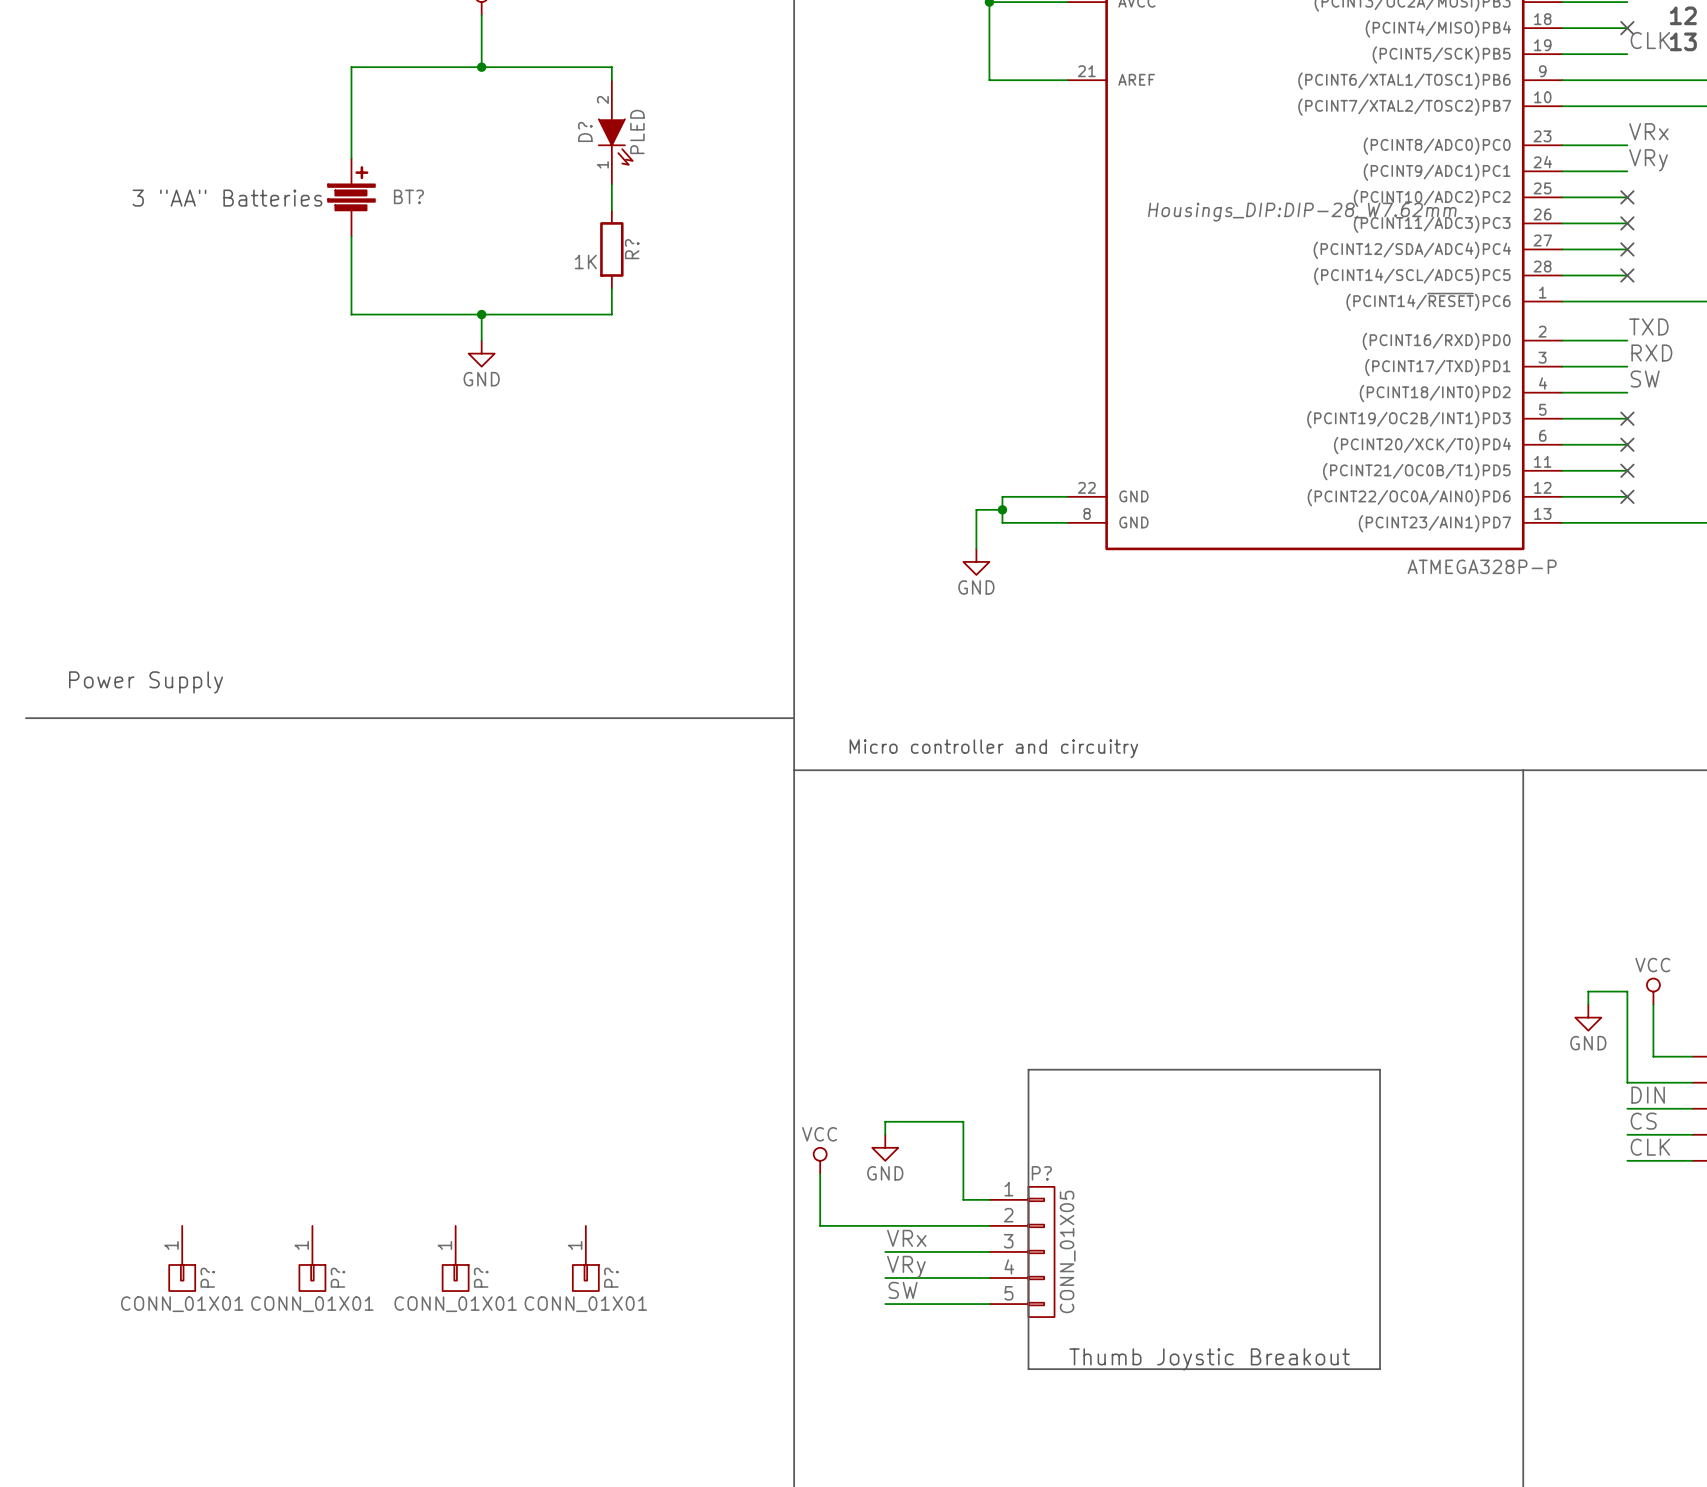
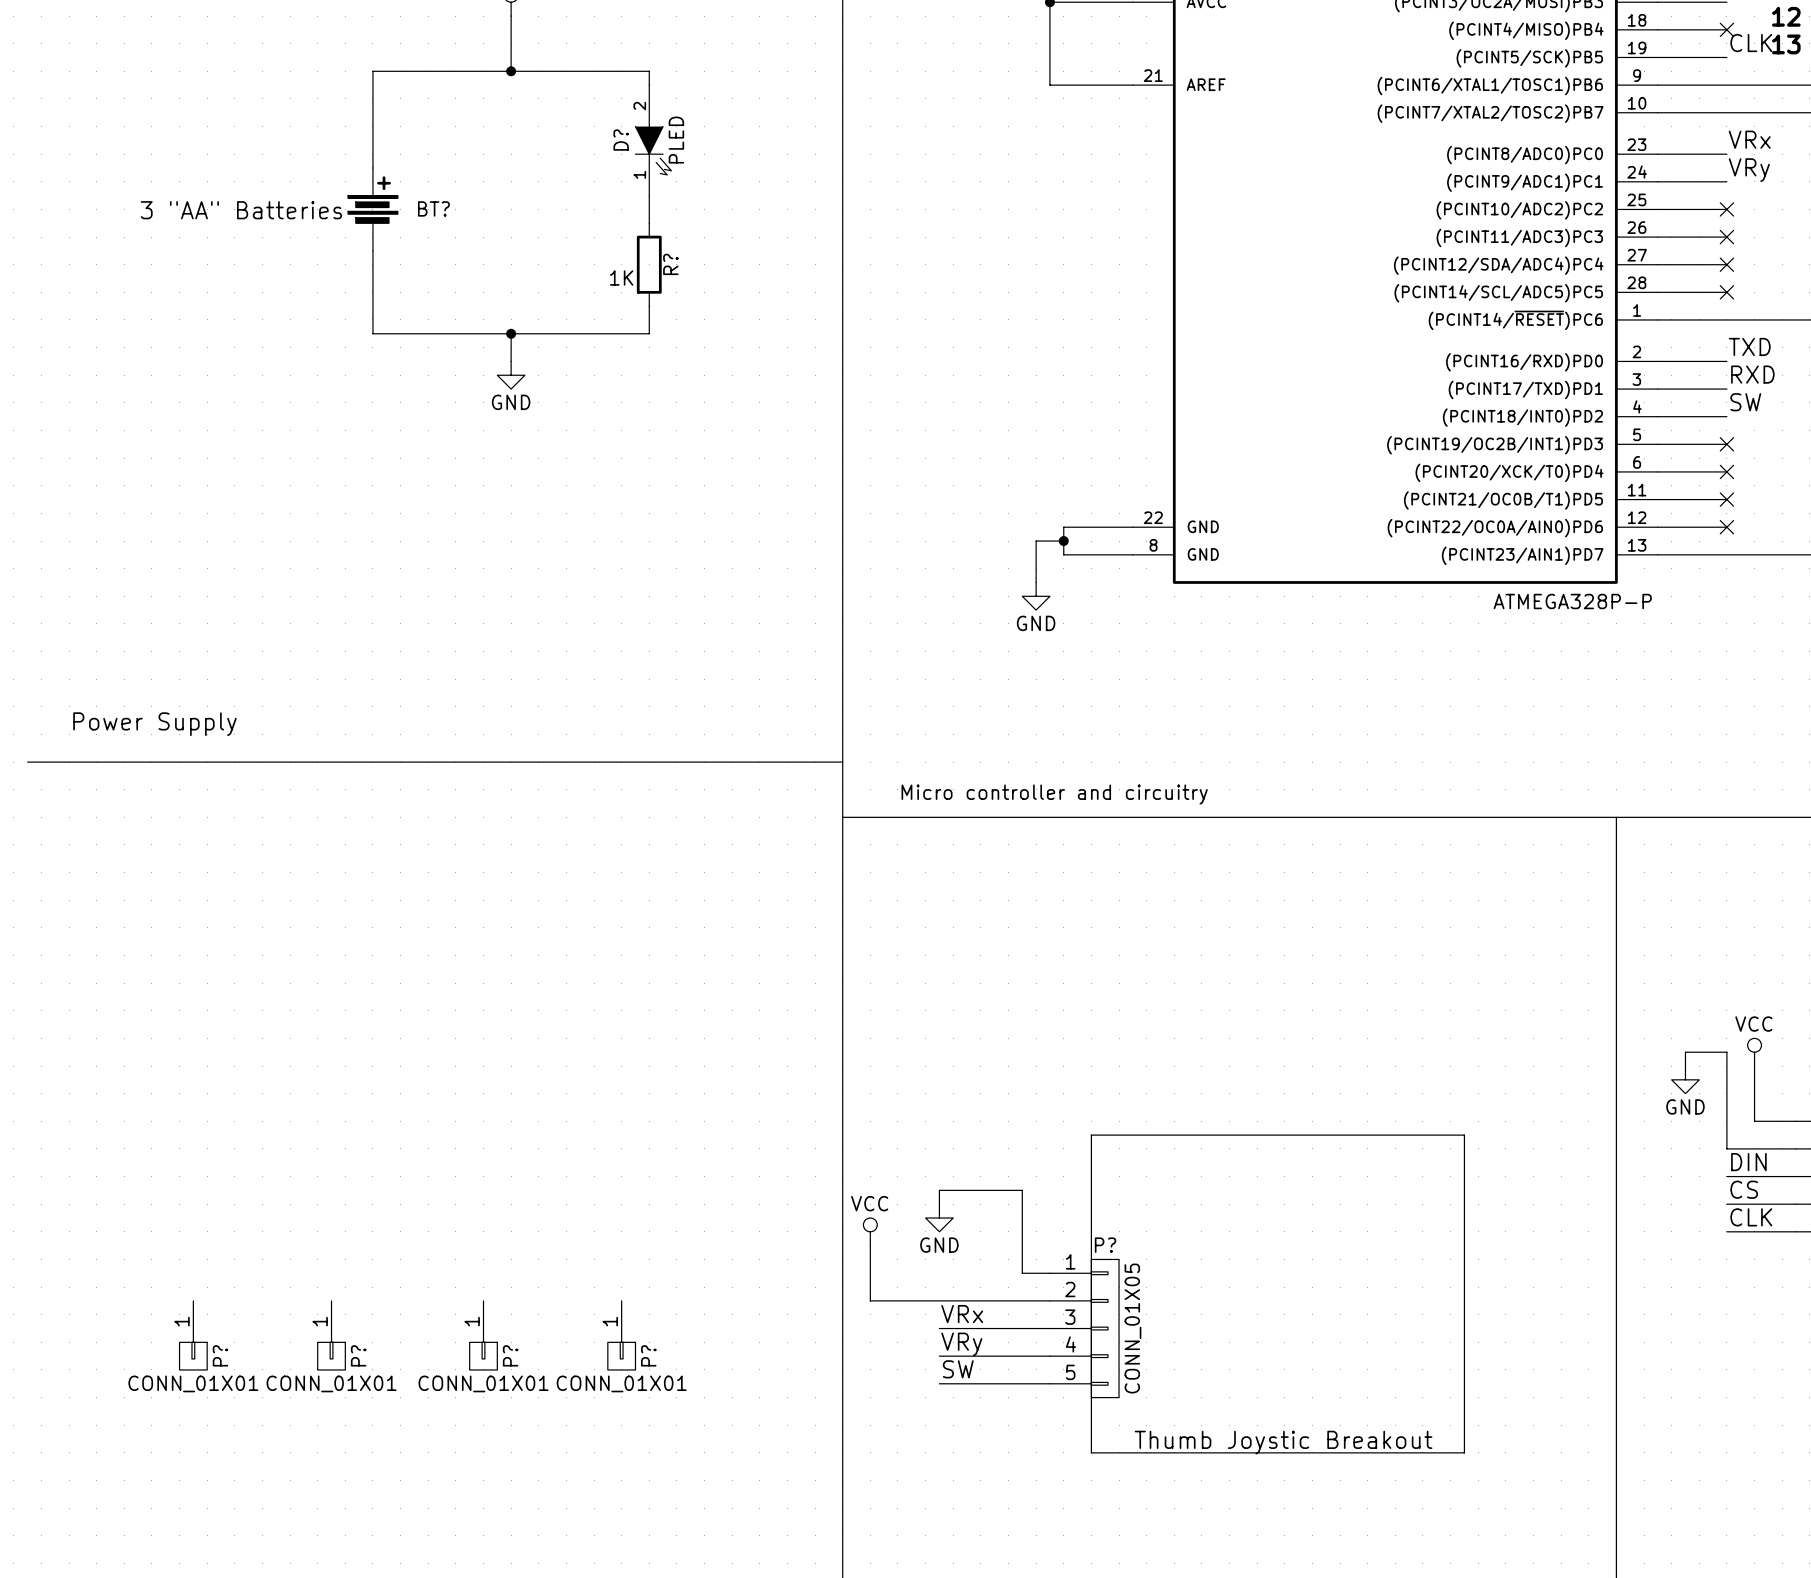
part text: Housings_DIP:DIP-28_W7.62mm (1302, 212) -> none

